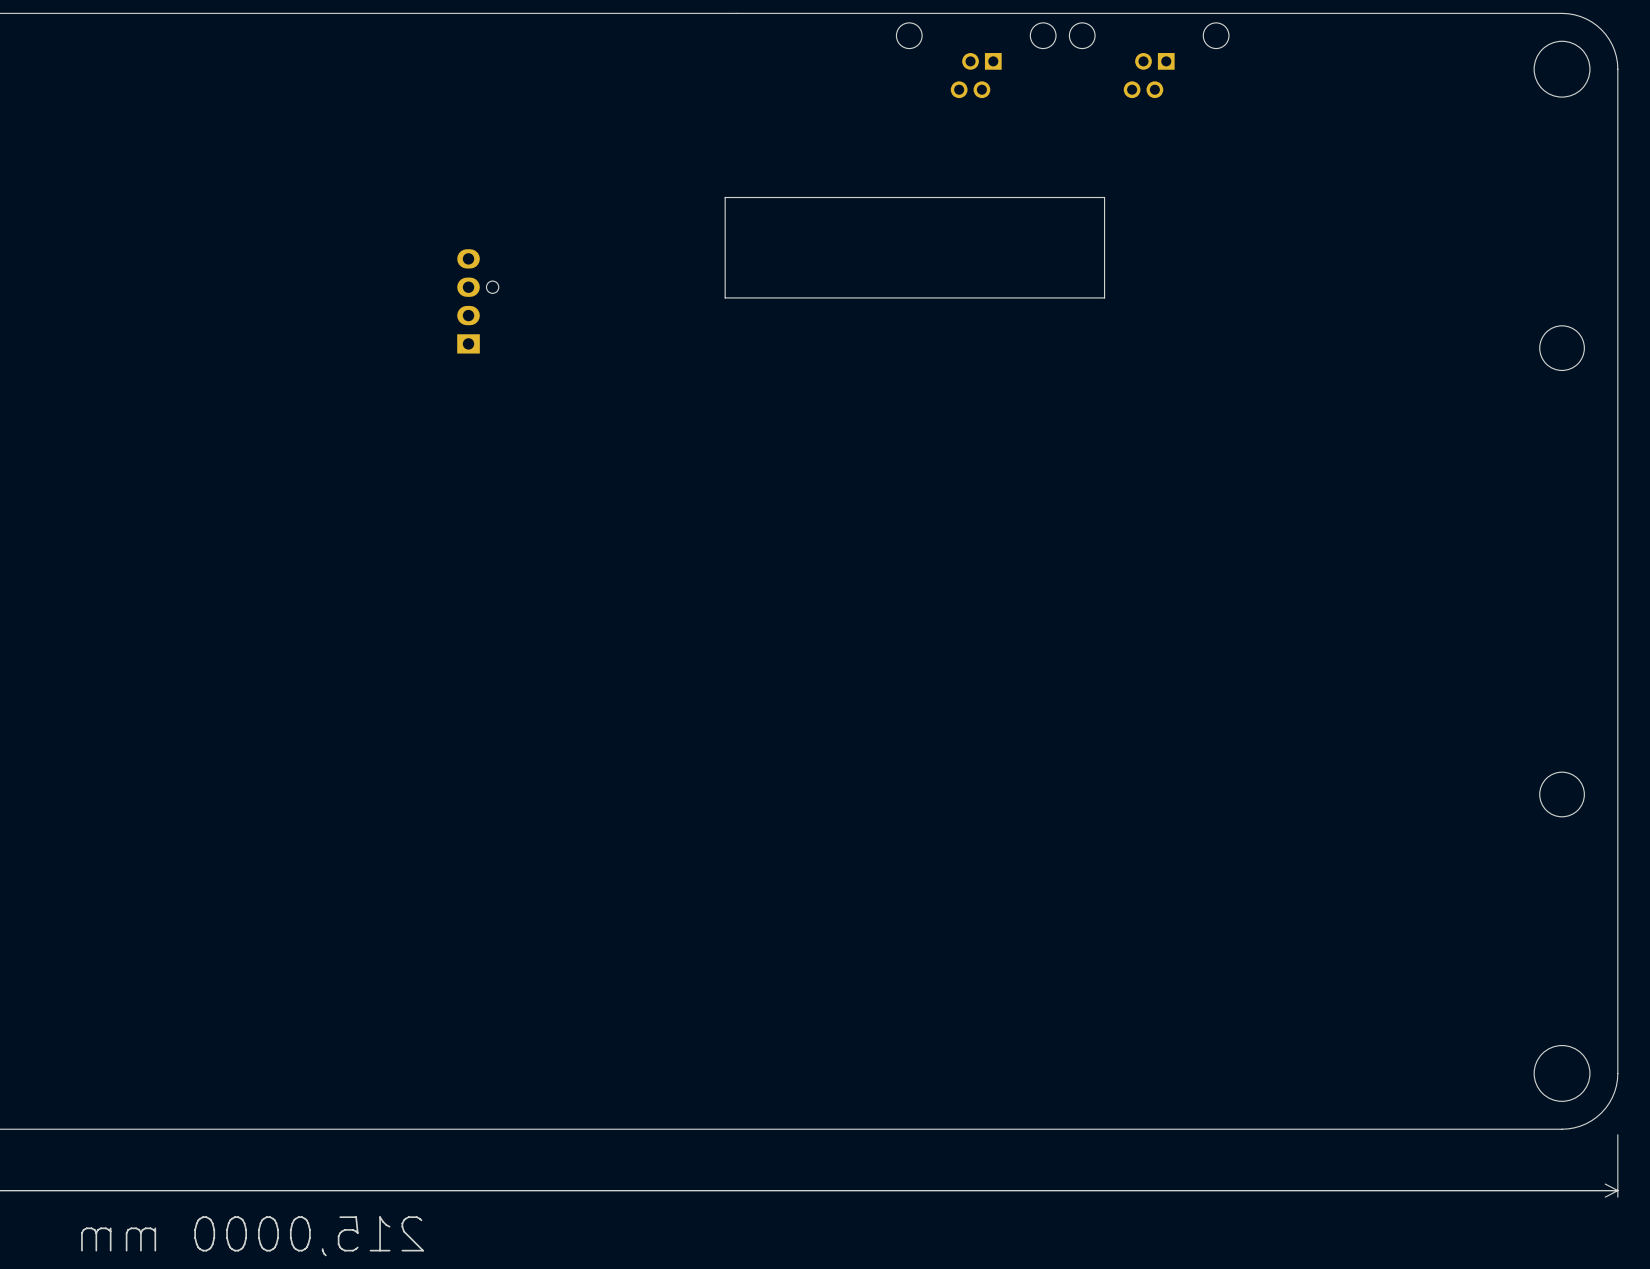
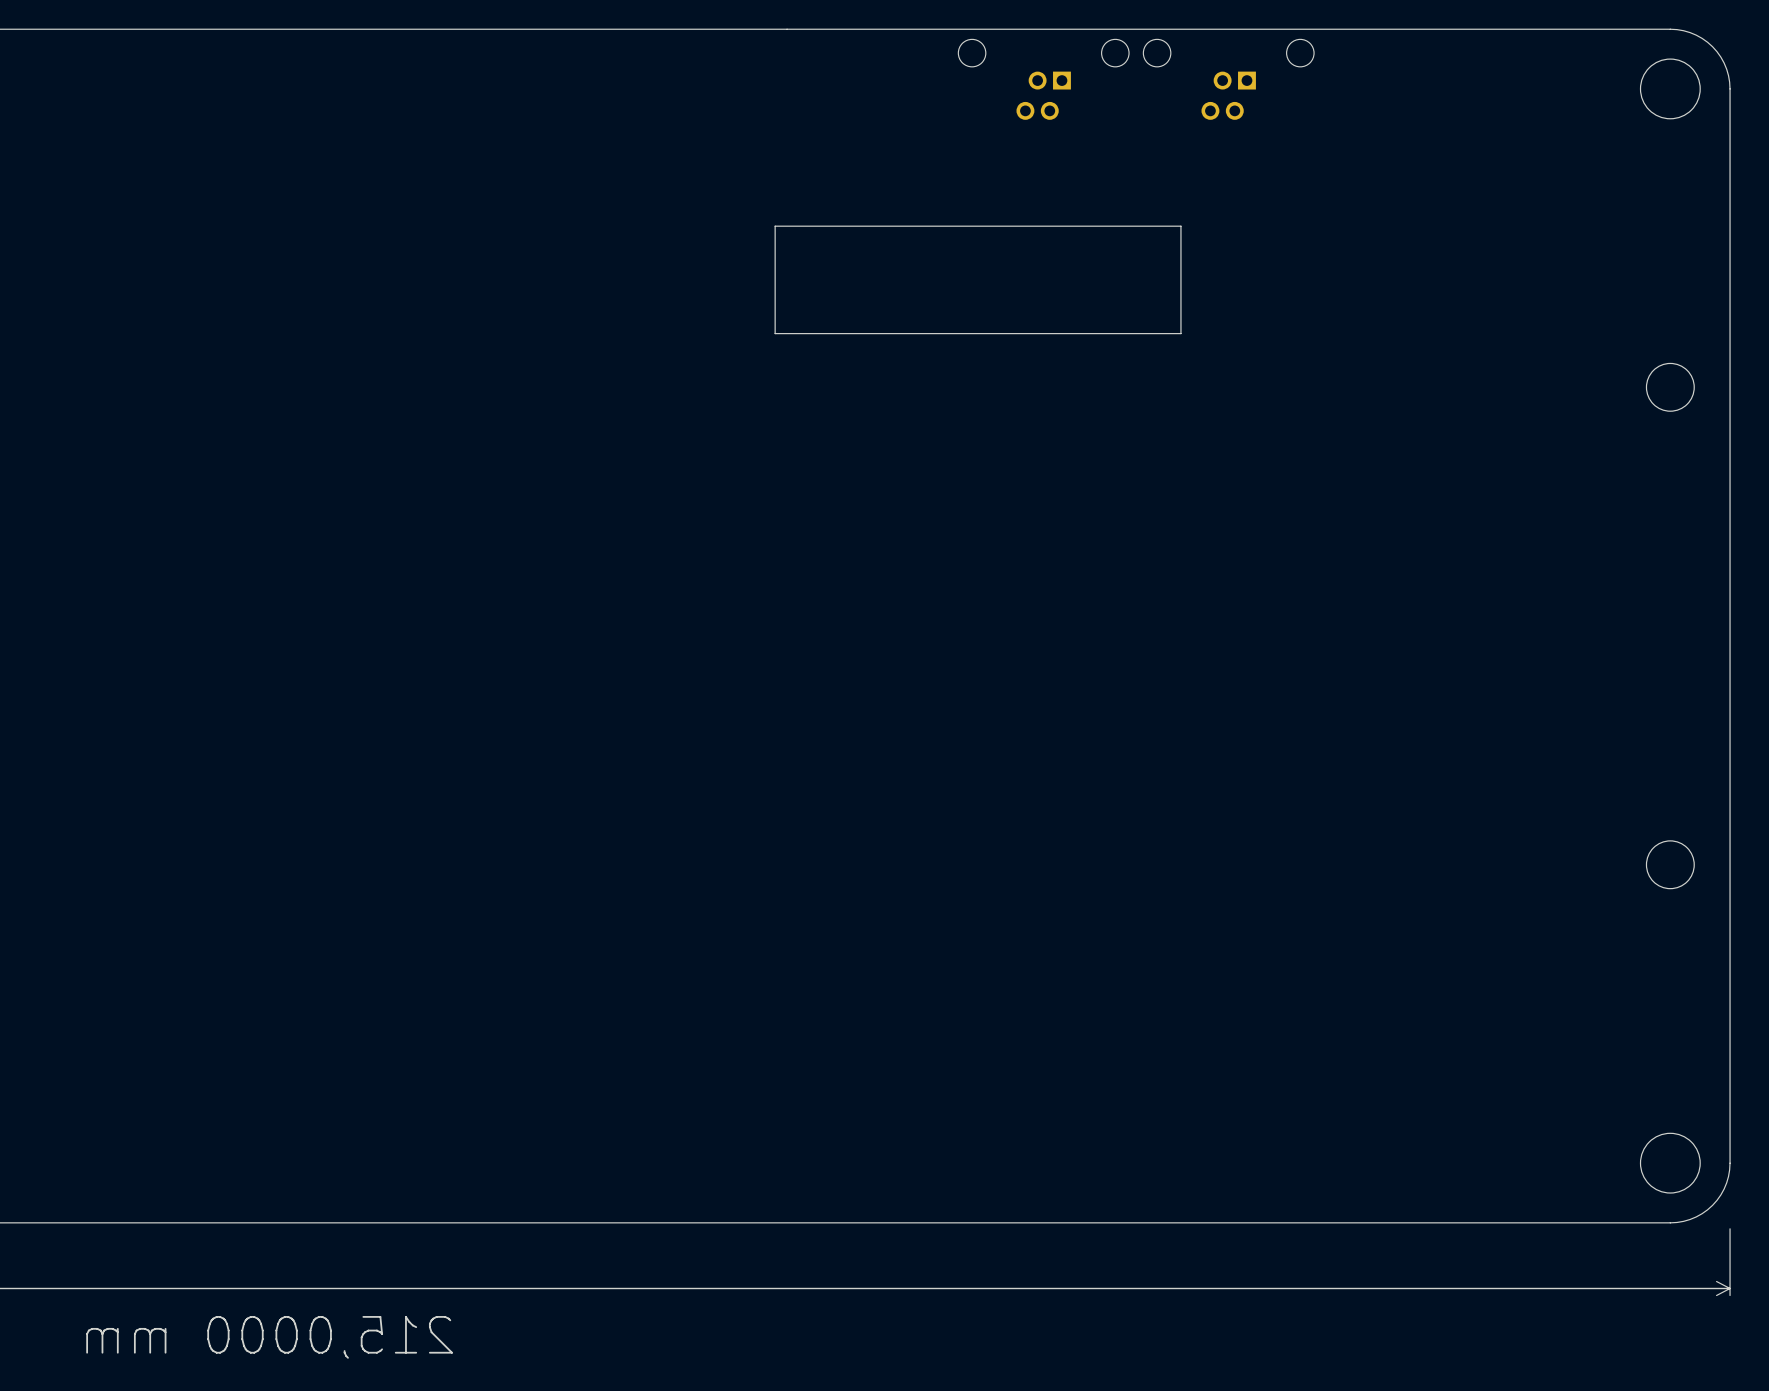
part: (477, 301) -> none

